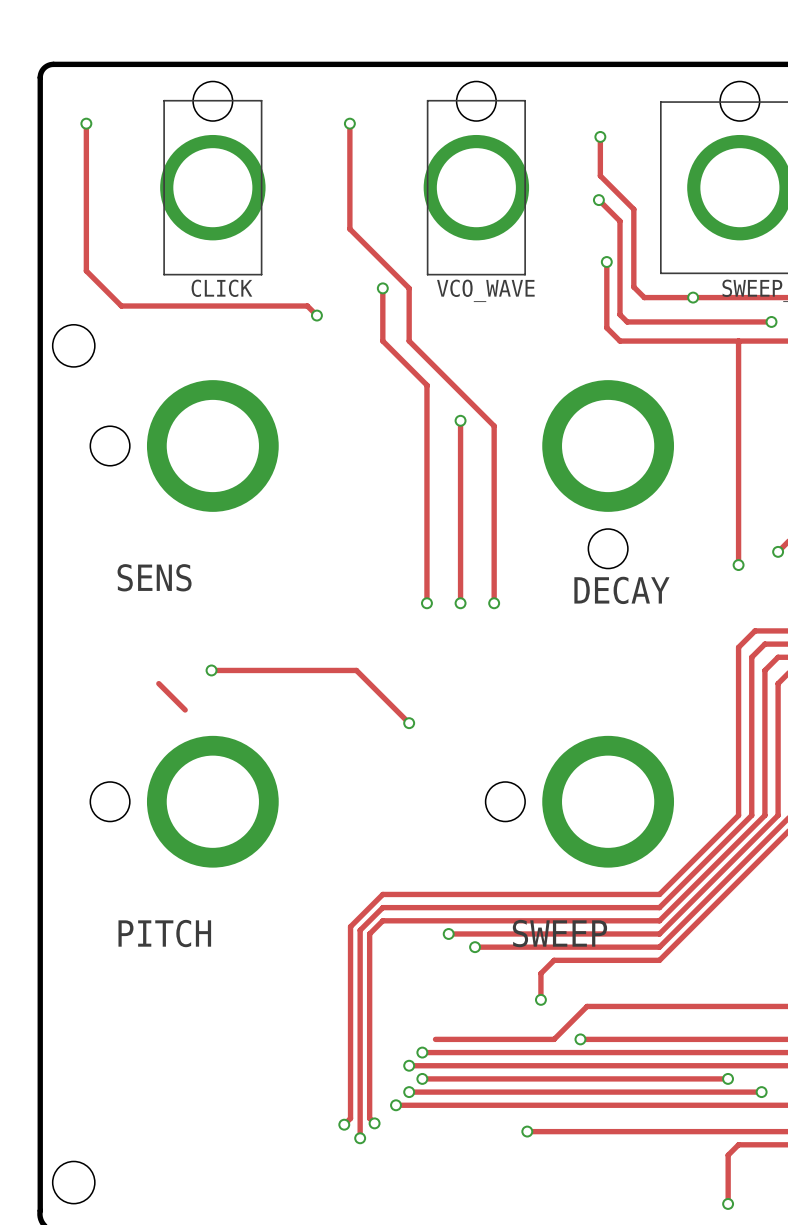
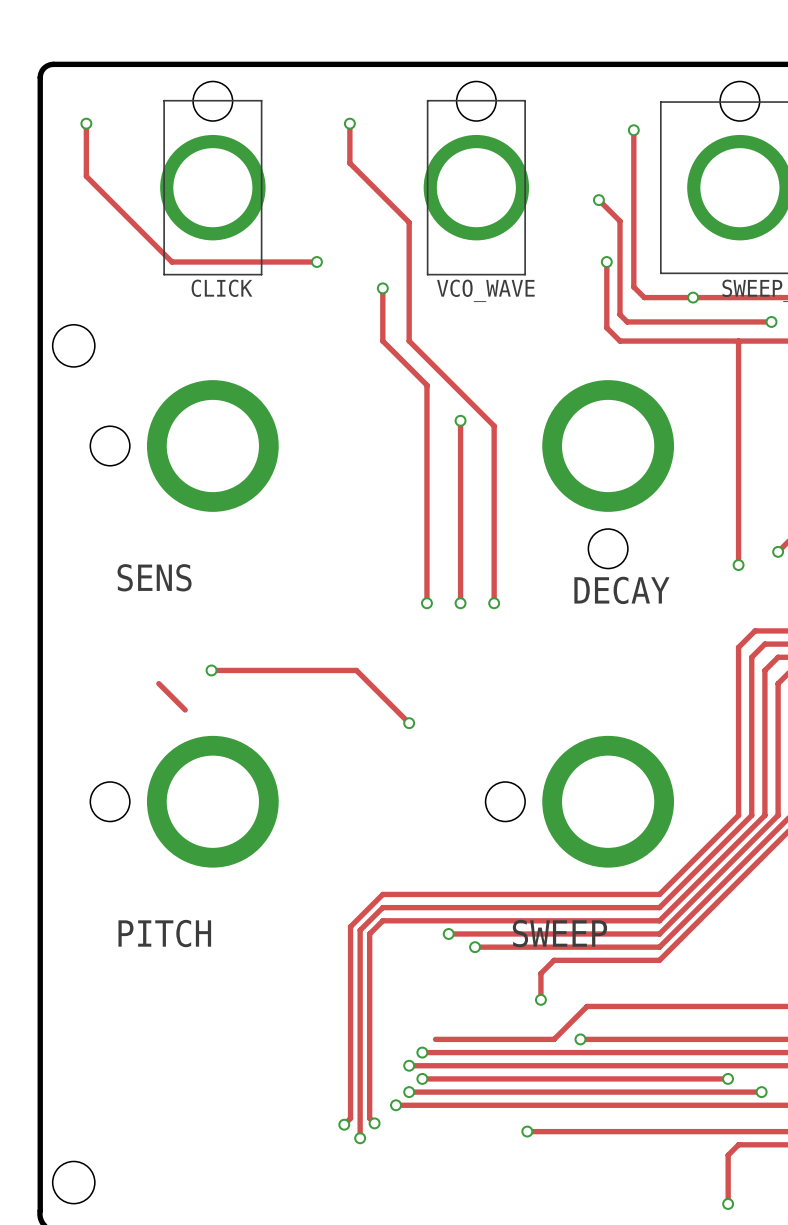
track: (600, 136) (600, 175) (633, 209) -> (633, 130) (633, 209)
via position: (600, 136) -> (633, 130)
track: (349, 163) (349, 229) (409, 288) -> (349, 163) (409, 222) (409, 288)
track: (86, 176) (86, 270) (121, 306) (307, 306) (316, 315) -> (86, 176) (172, 262) (316, 262)
via position: (316, 315) -> (316, 262)

